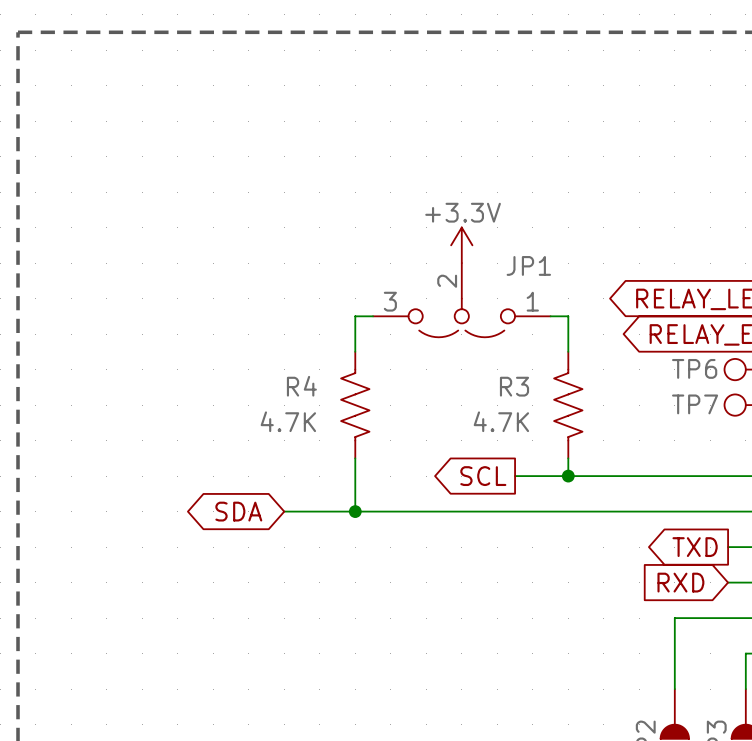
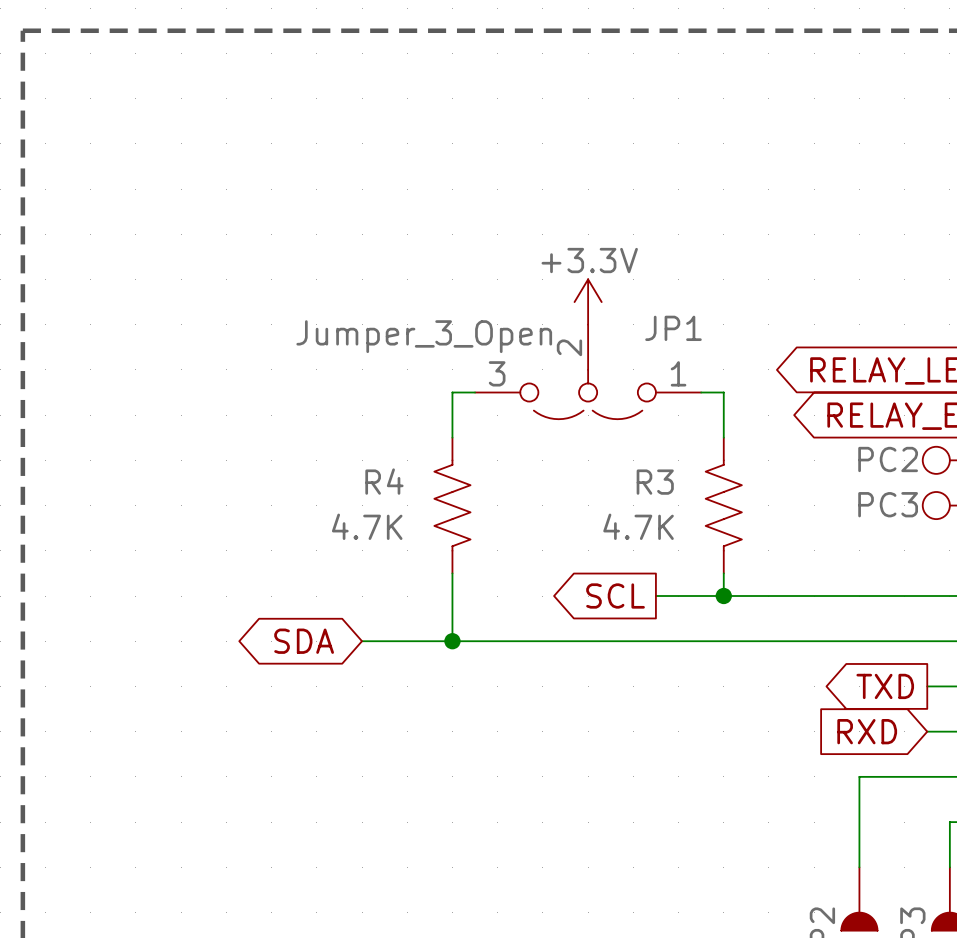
JP1 value: none -> Jumper_3_Open (424, 336)
TP6 name: TP6 (694, 368) -> none
TP6 value: none -> PC2 (888, 459)
TP7 name: TP7 (695, 404) -> none
TP7 value: none -> PC3 (888, 504)

